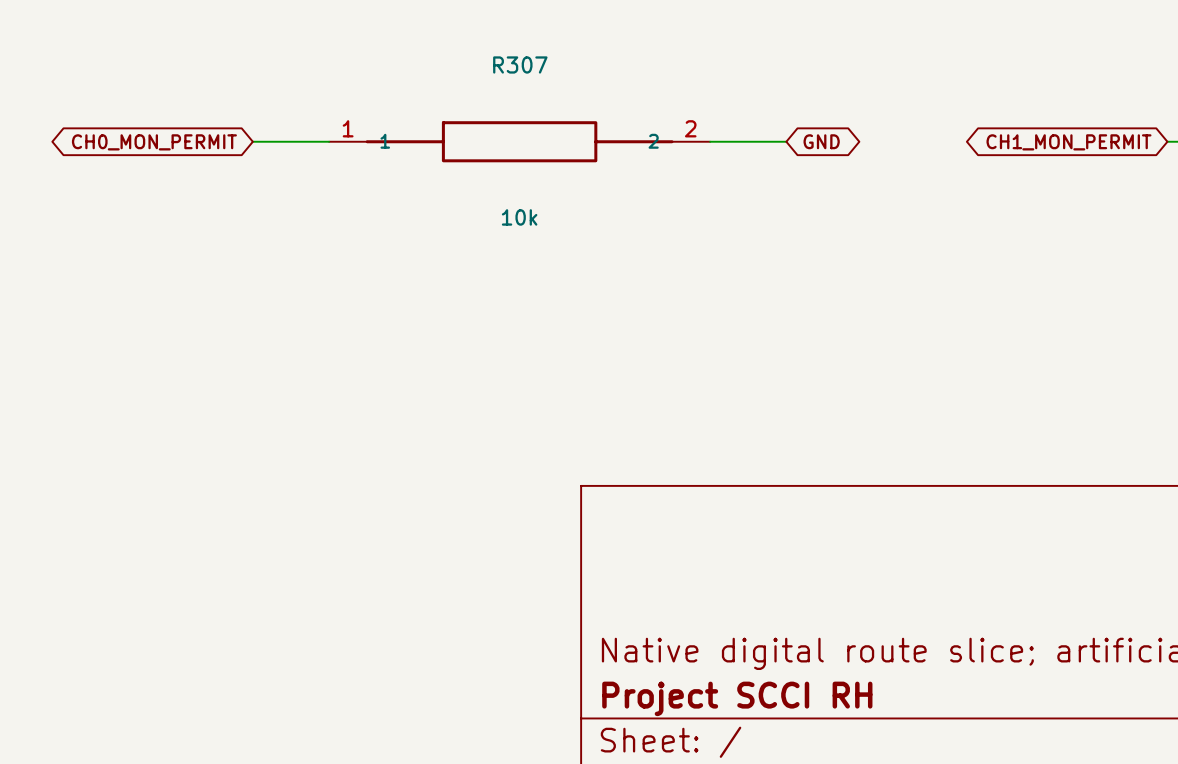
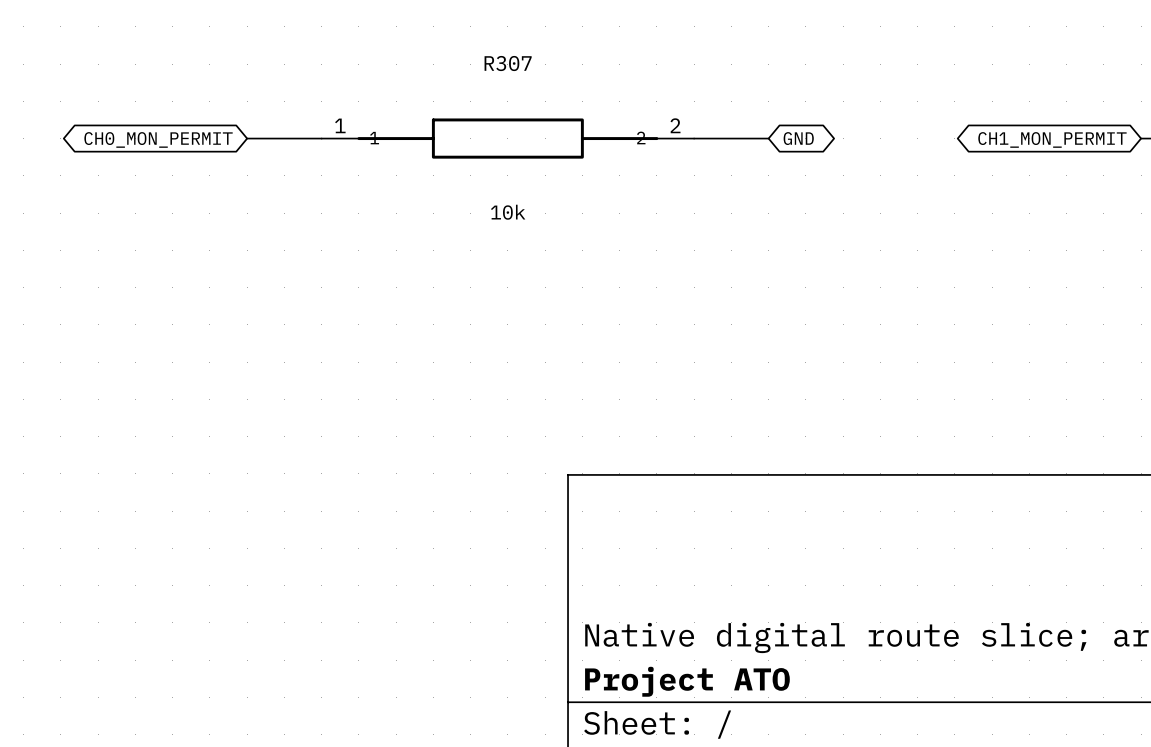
title block: Project SCCI RH (737, 698) -> Project ATO (687, 681)

